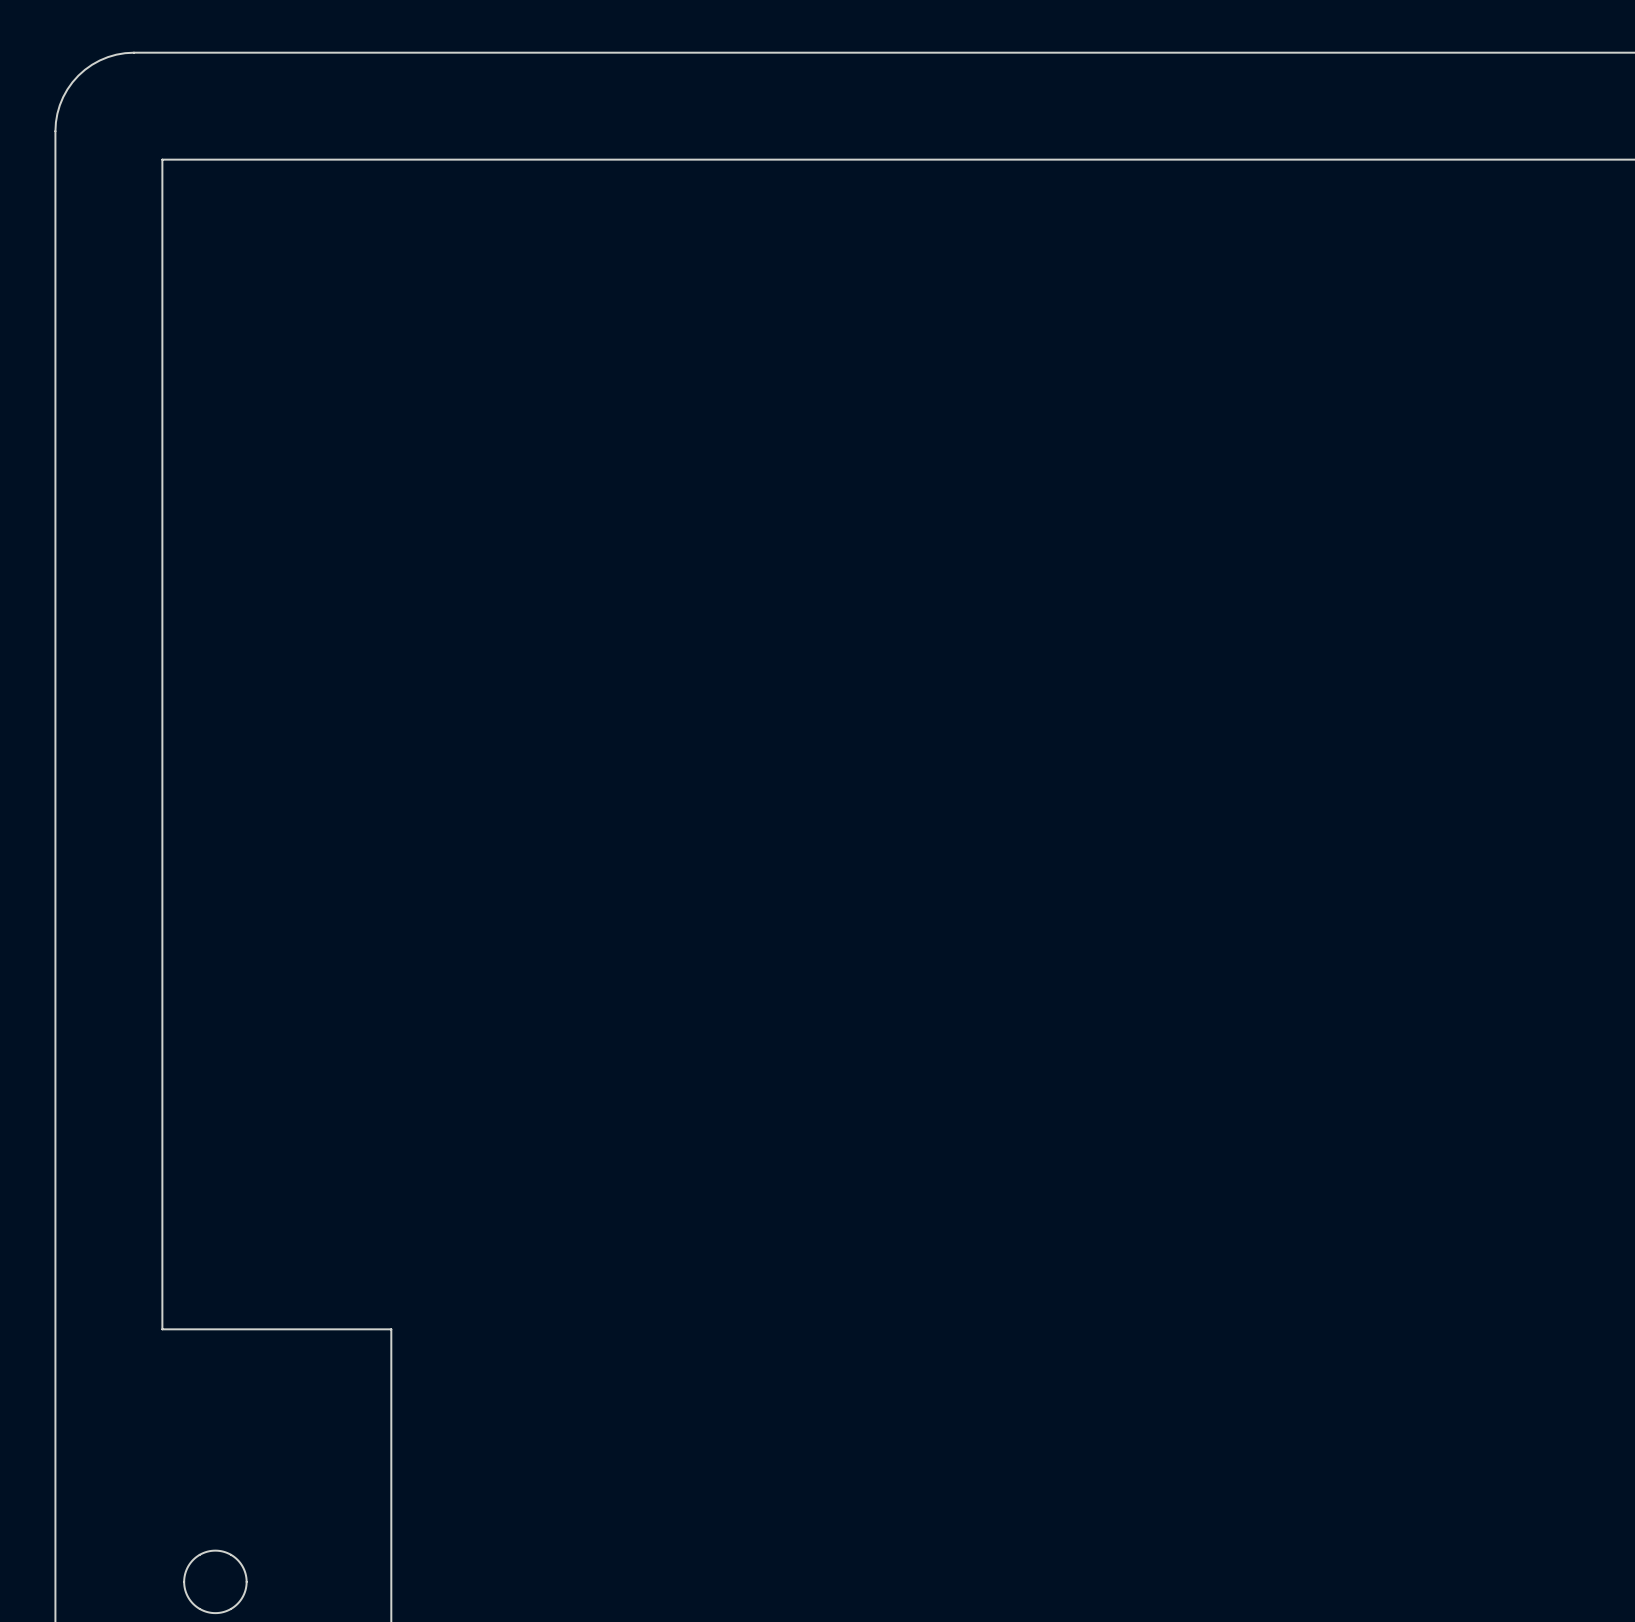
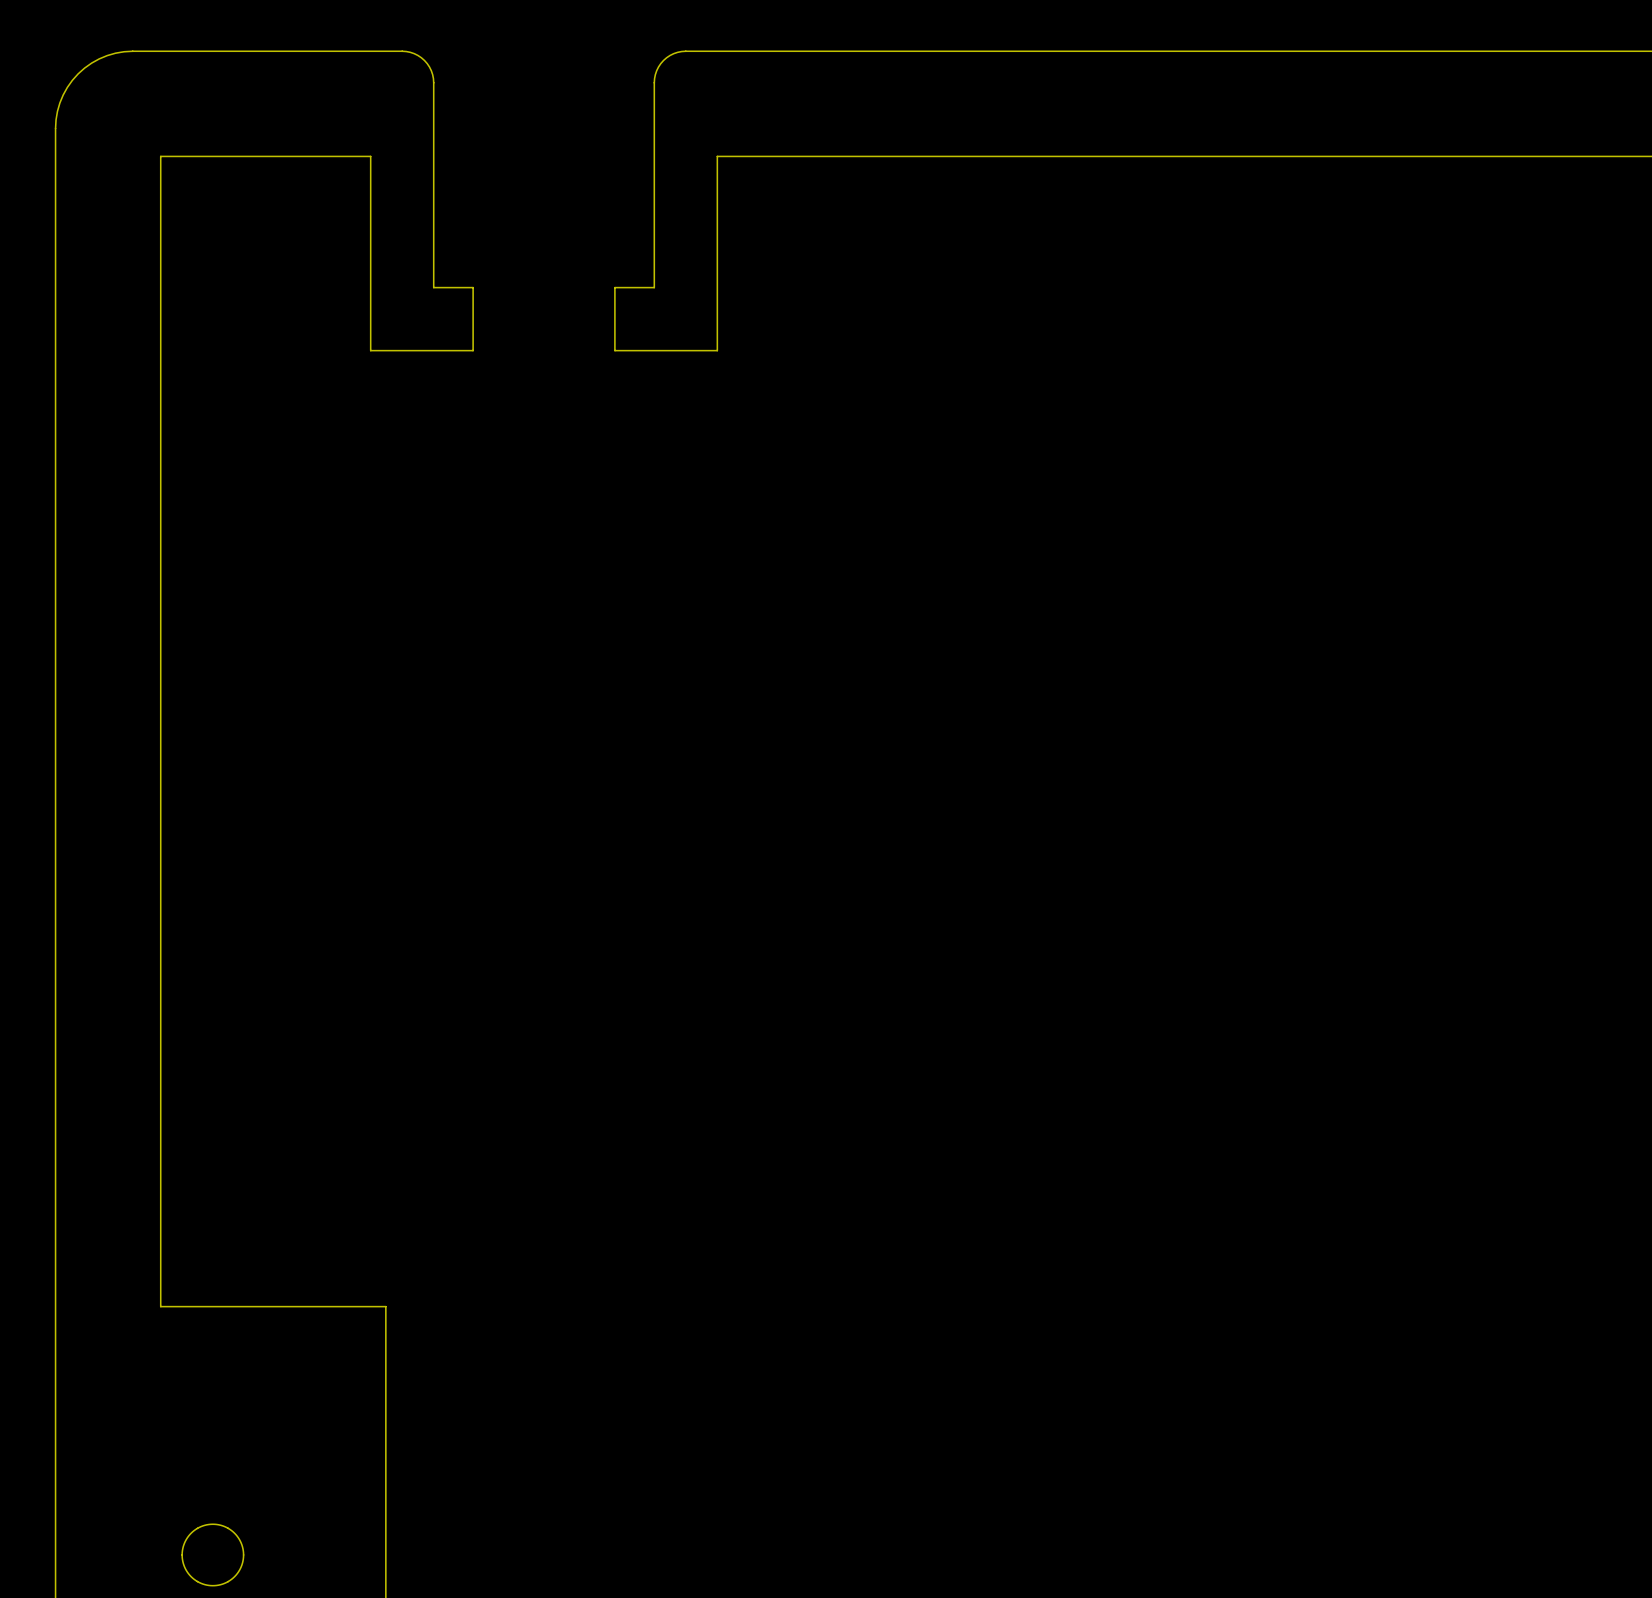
board edge: (407, 52) (696, 52) -> (402, 51) (414, 53) (421, 57) (429, 67) (432, 74) (433, 287) (473, 287) (473, 350) (370, 350) (370, 156)
board edge: (375, 159) (728, 159) -> (685, 51) (673, 53) (666, 57) (660, 63) (655, 74) (654, 287) (614, 287) (614, 350) (717, 350) (717, 156)

